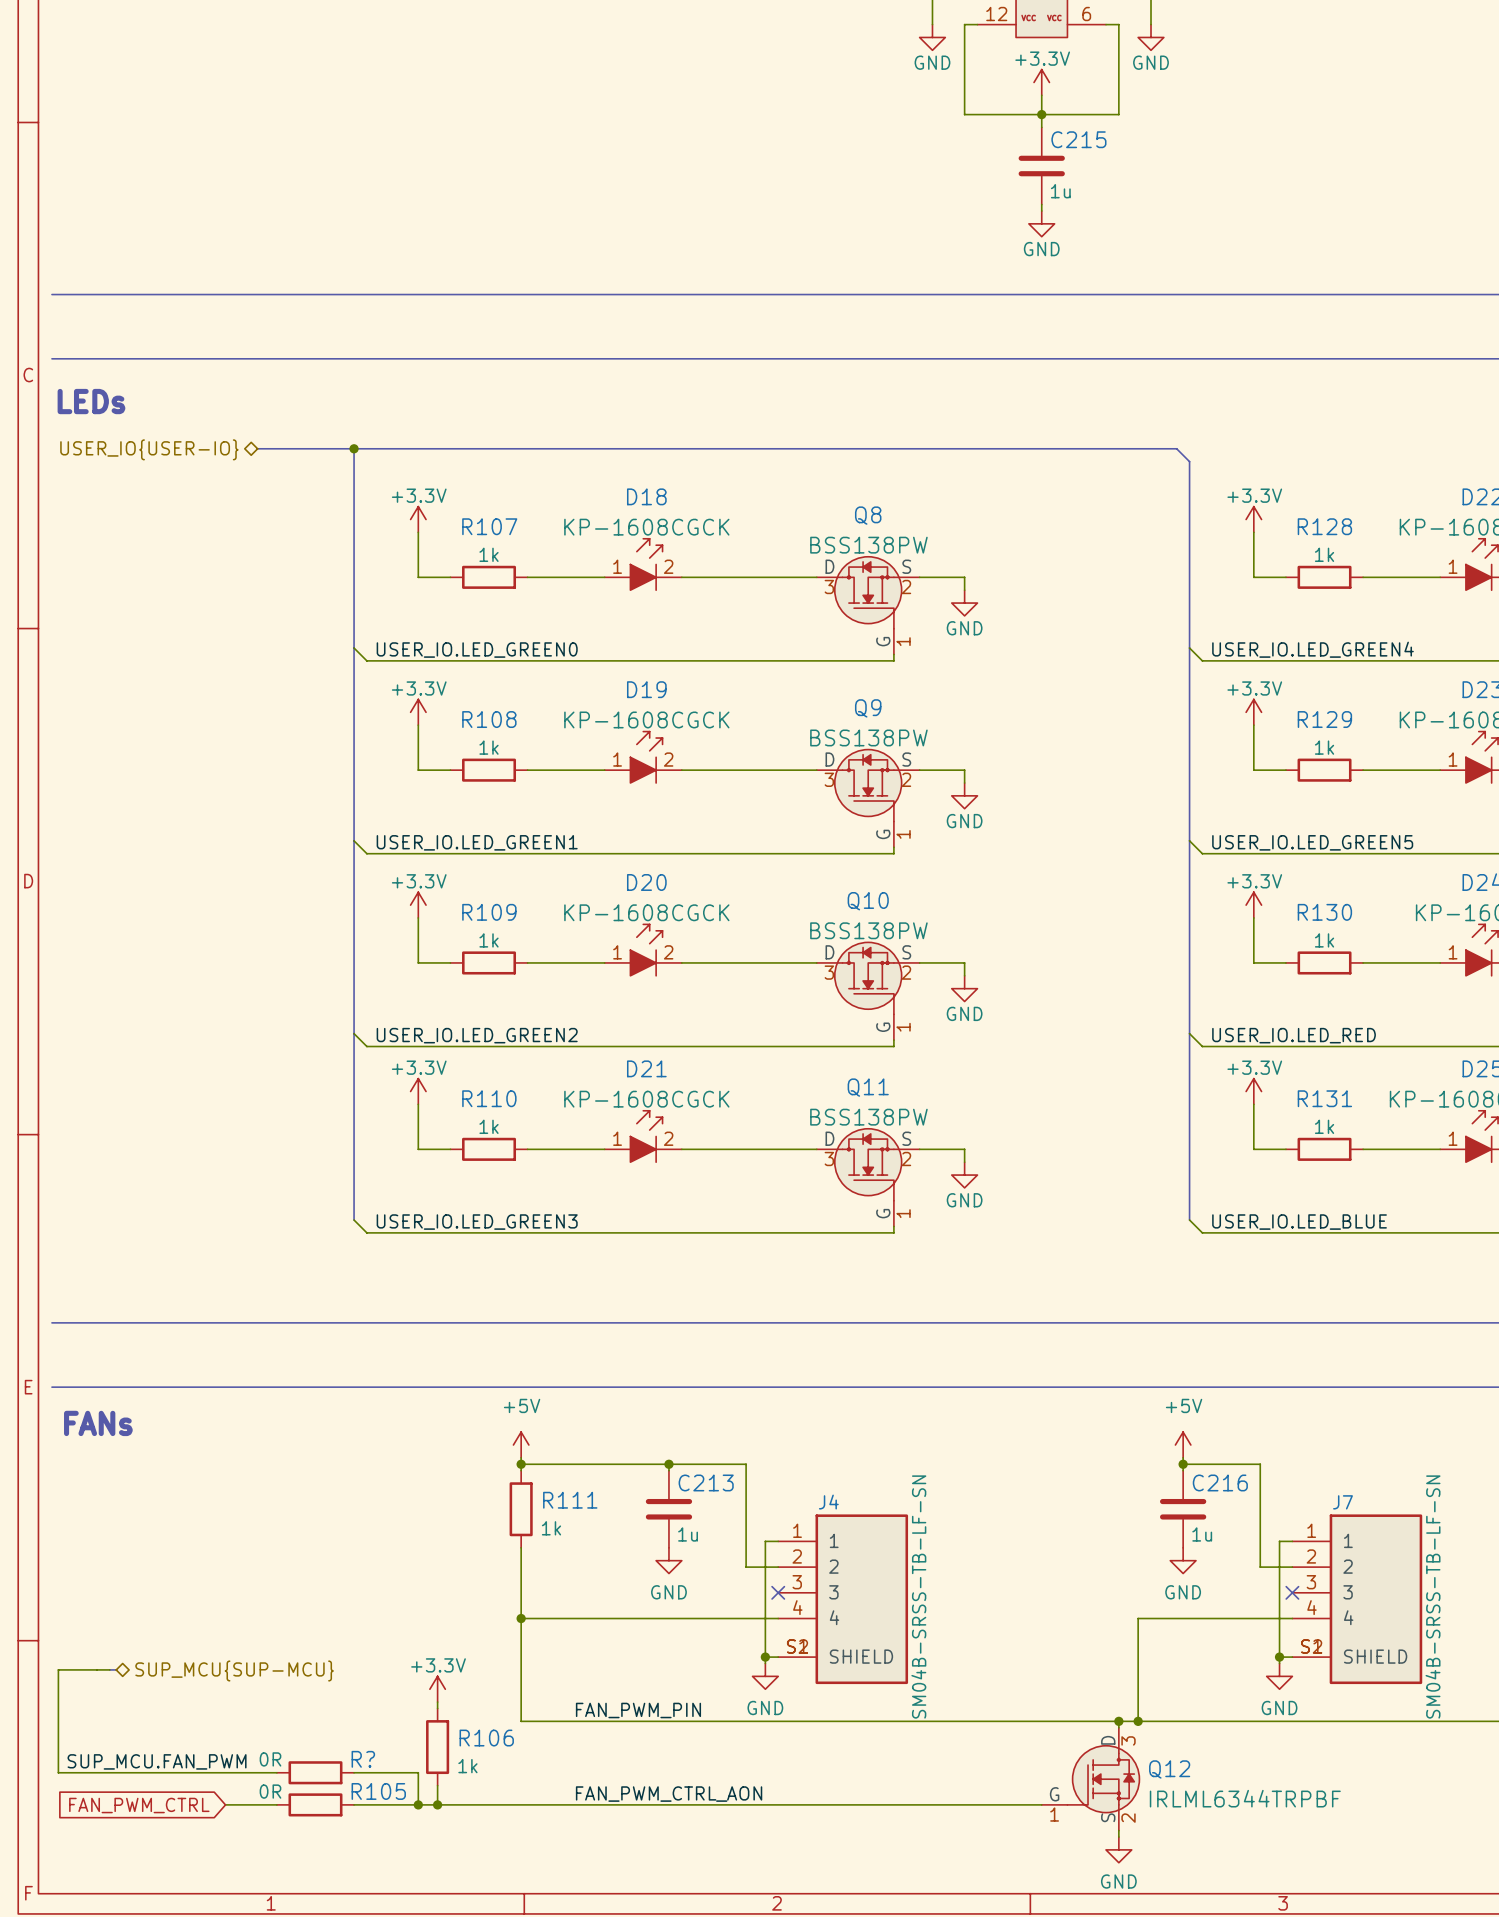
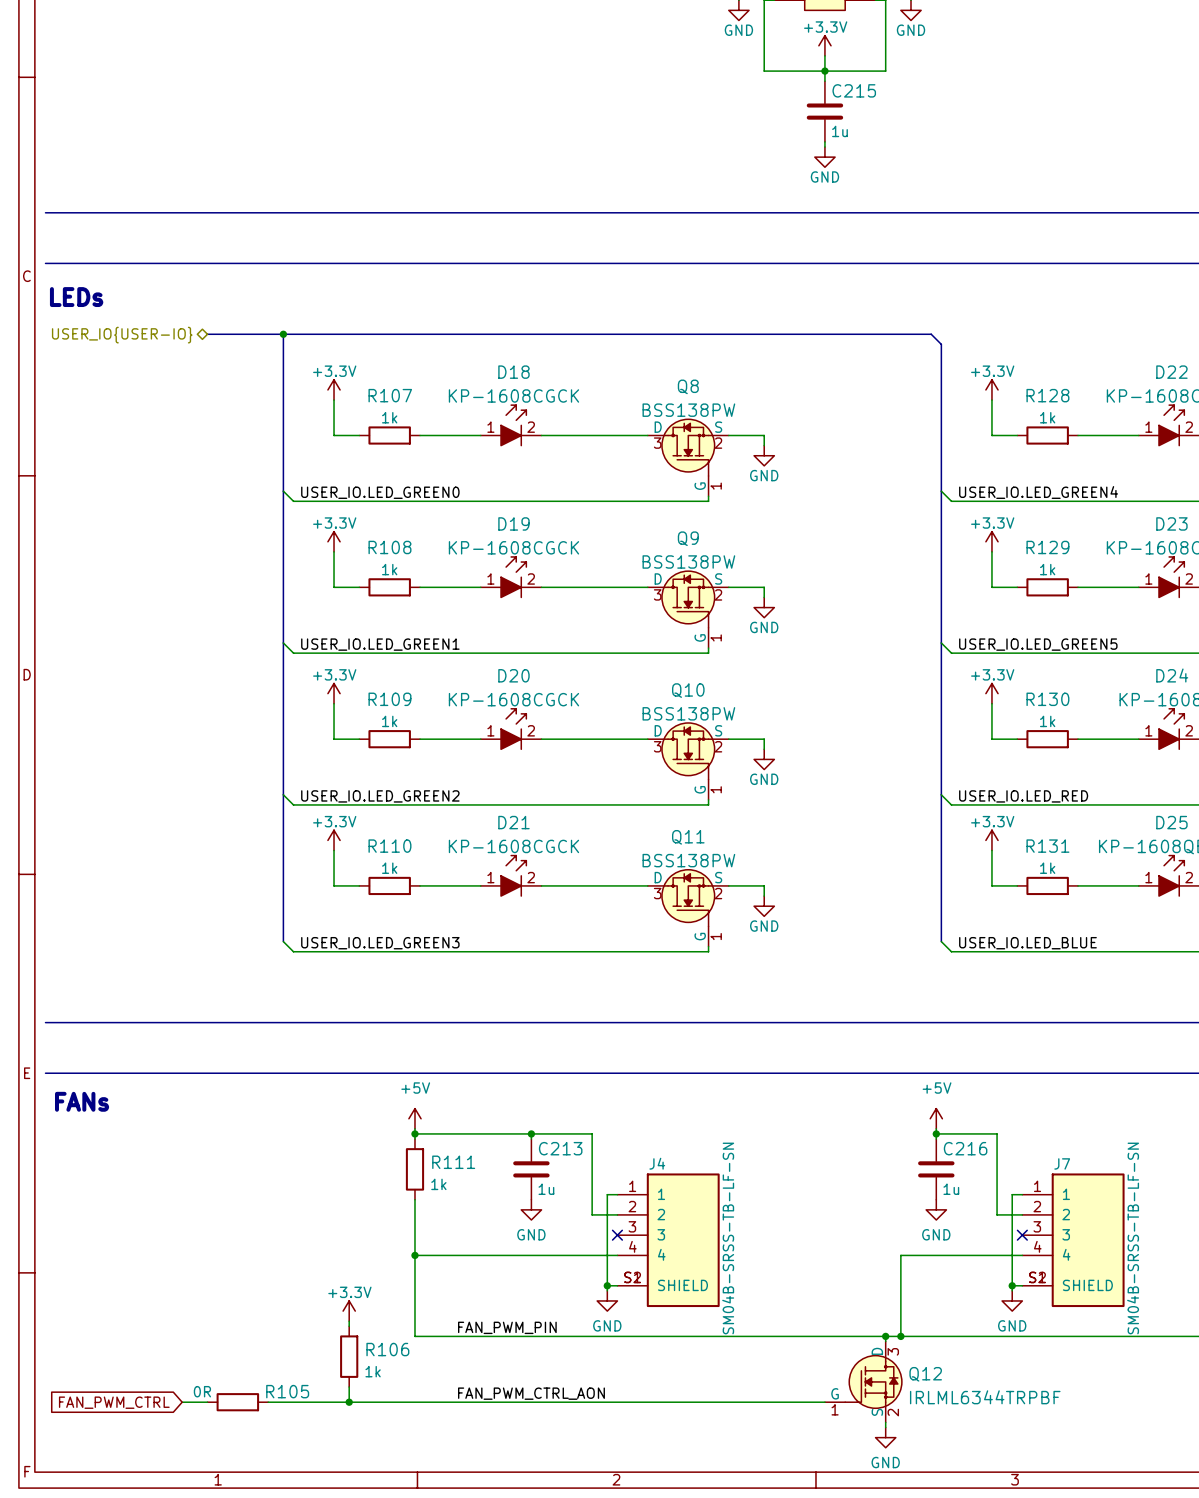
wire: (109, 1669) (58, 1669) (58, 1772) (276, 1772) -> none
bus: (109, 1669) (116, 1669) -> none
hierarchical label: SUP_MCU{SUP-MCU} (234, 1670) -> none
label: SUP_MCU.FAN_PWM (157, 1761) -> none
R?: (315, 1772) -> none
wire: (354, 1772) (418, 1772) (418, 1804) -> none
R105 position: (315, 1804) -> (237, 1402)
junction: (418, 1804) -> none

